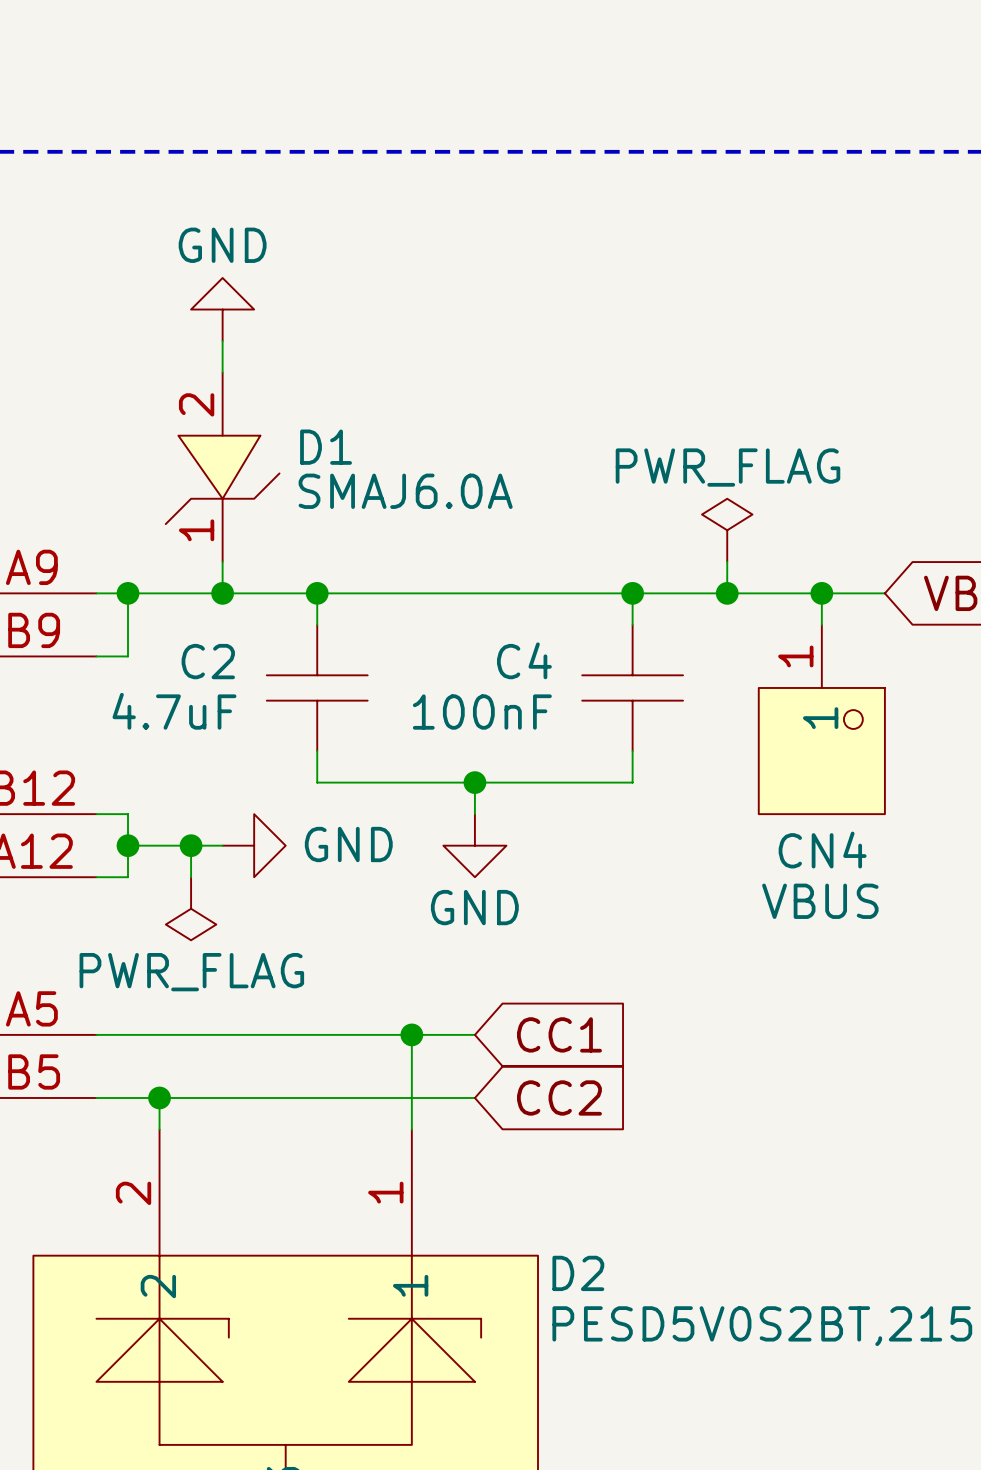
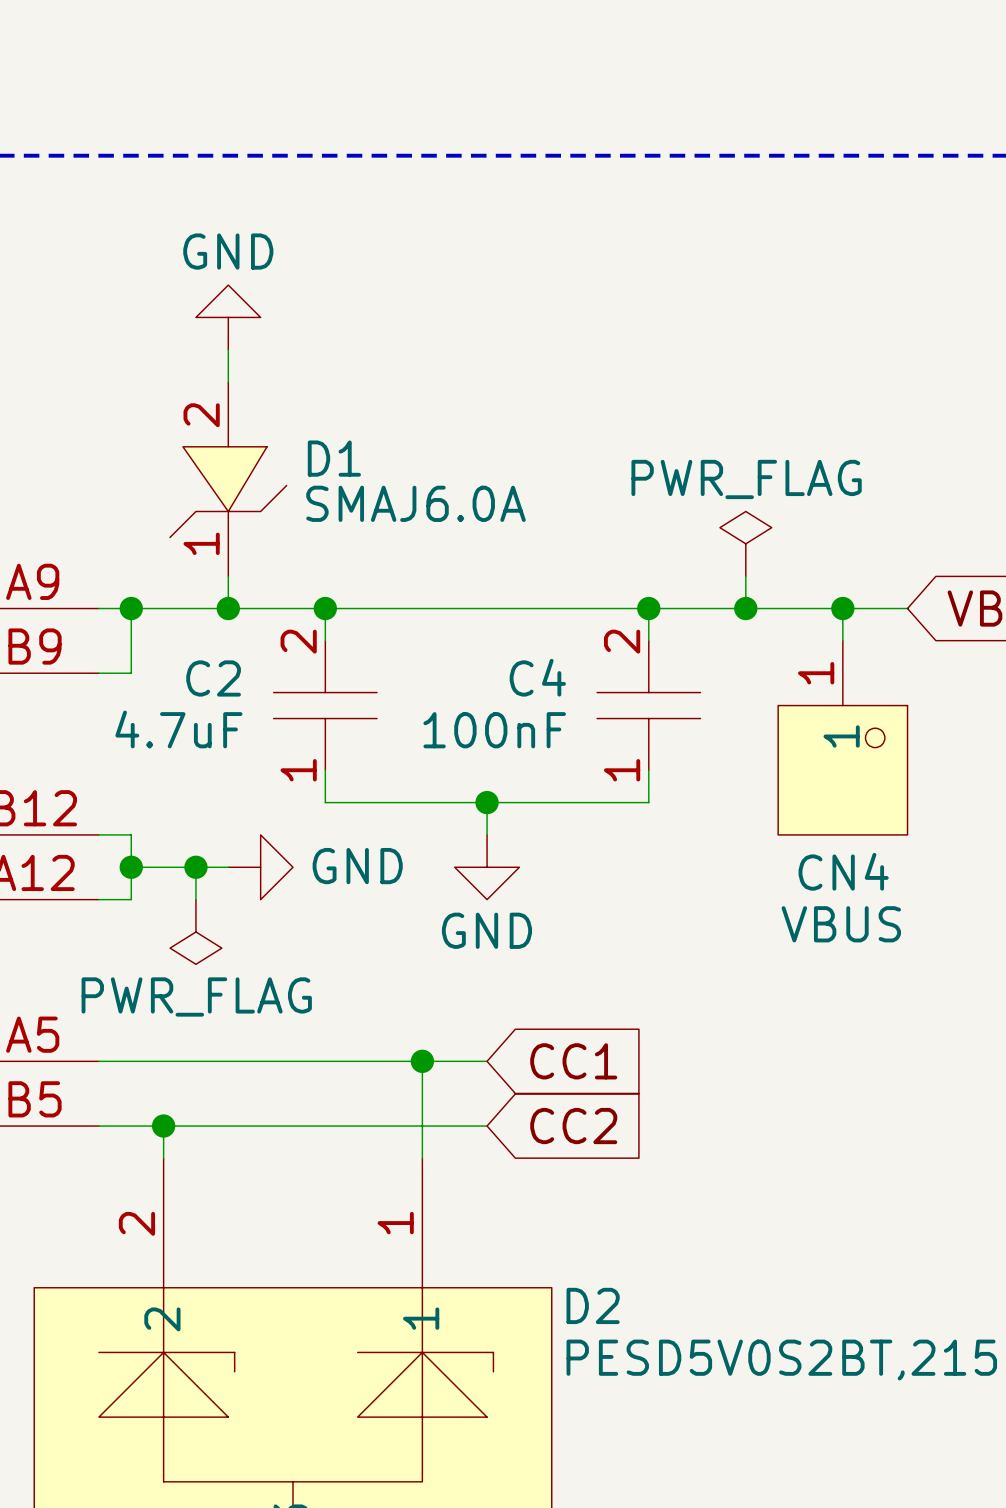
C2 pin number: none -> 2 (298, 641)
C4 pin number: none -> 2 (622, 641)
C2 pin number: none -> 1 (298, 770)
C4 pin number: none -> 1 (622, 770)

